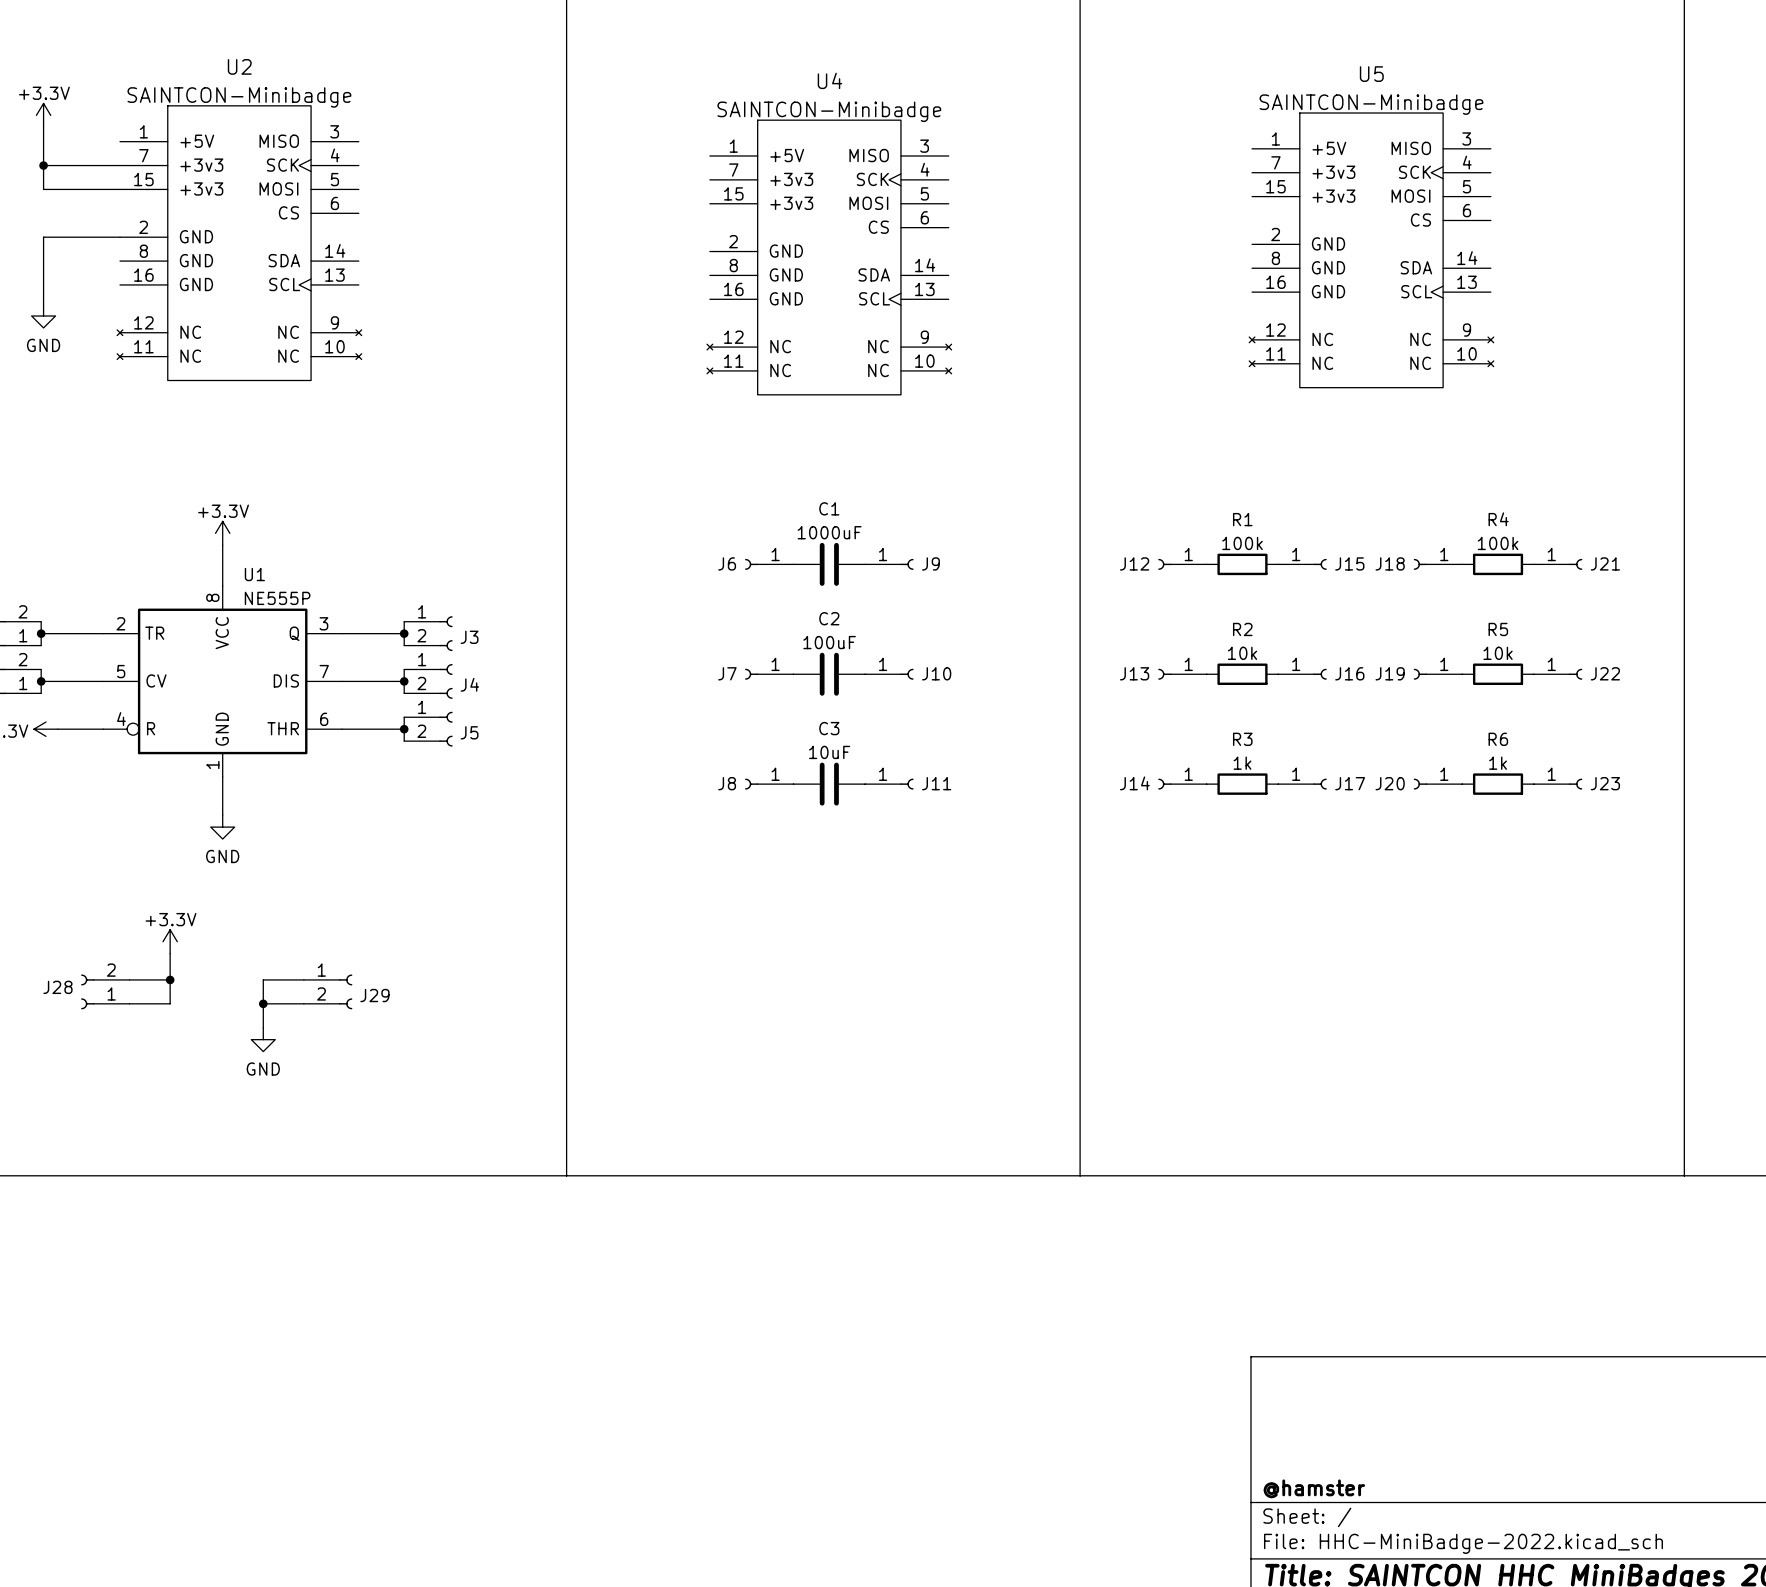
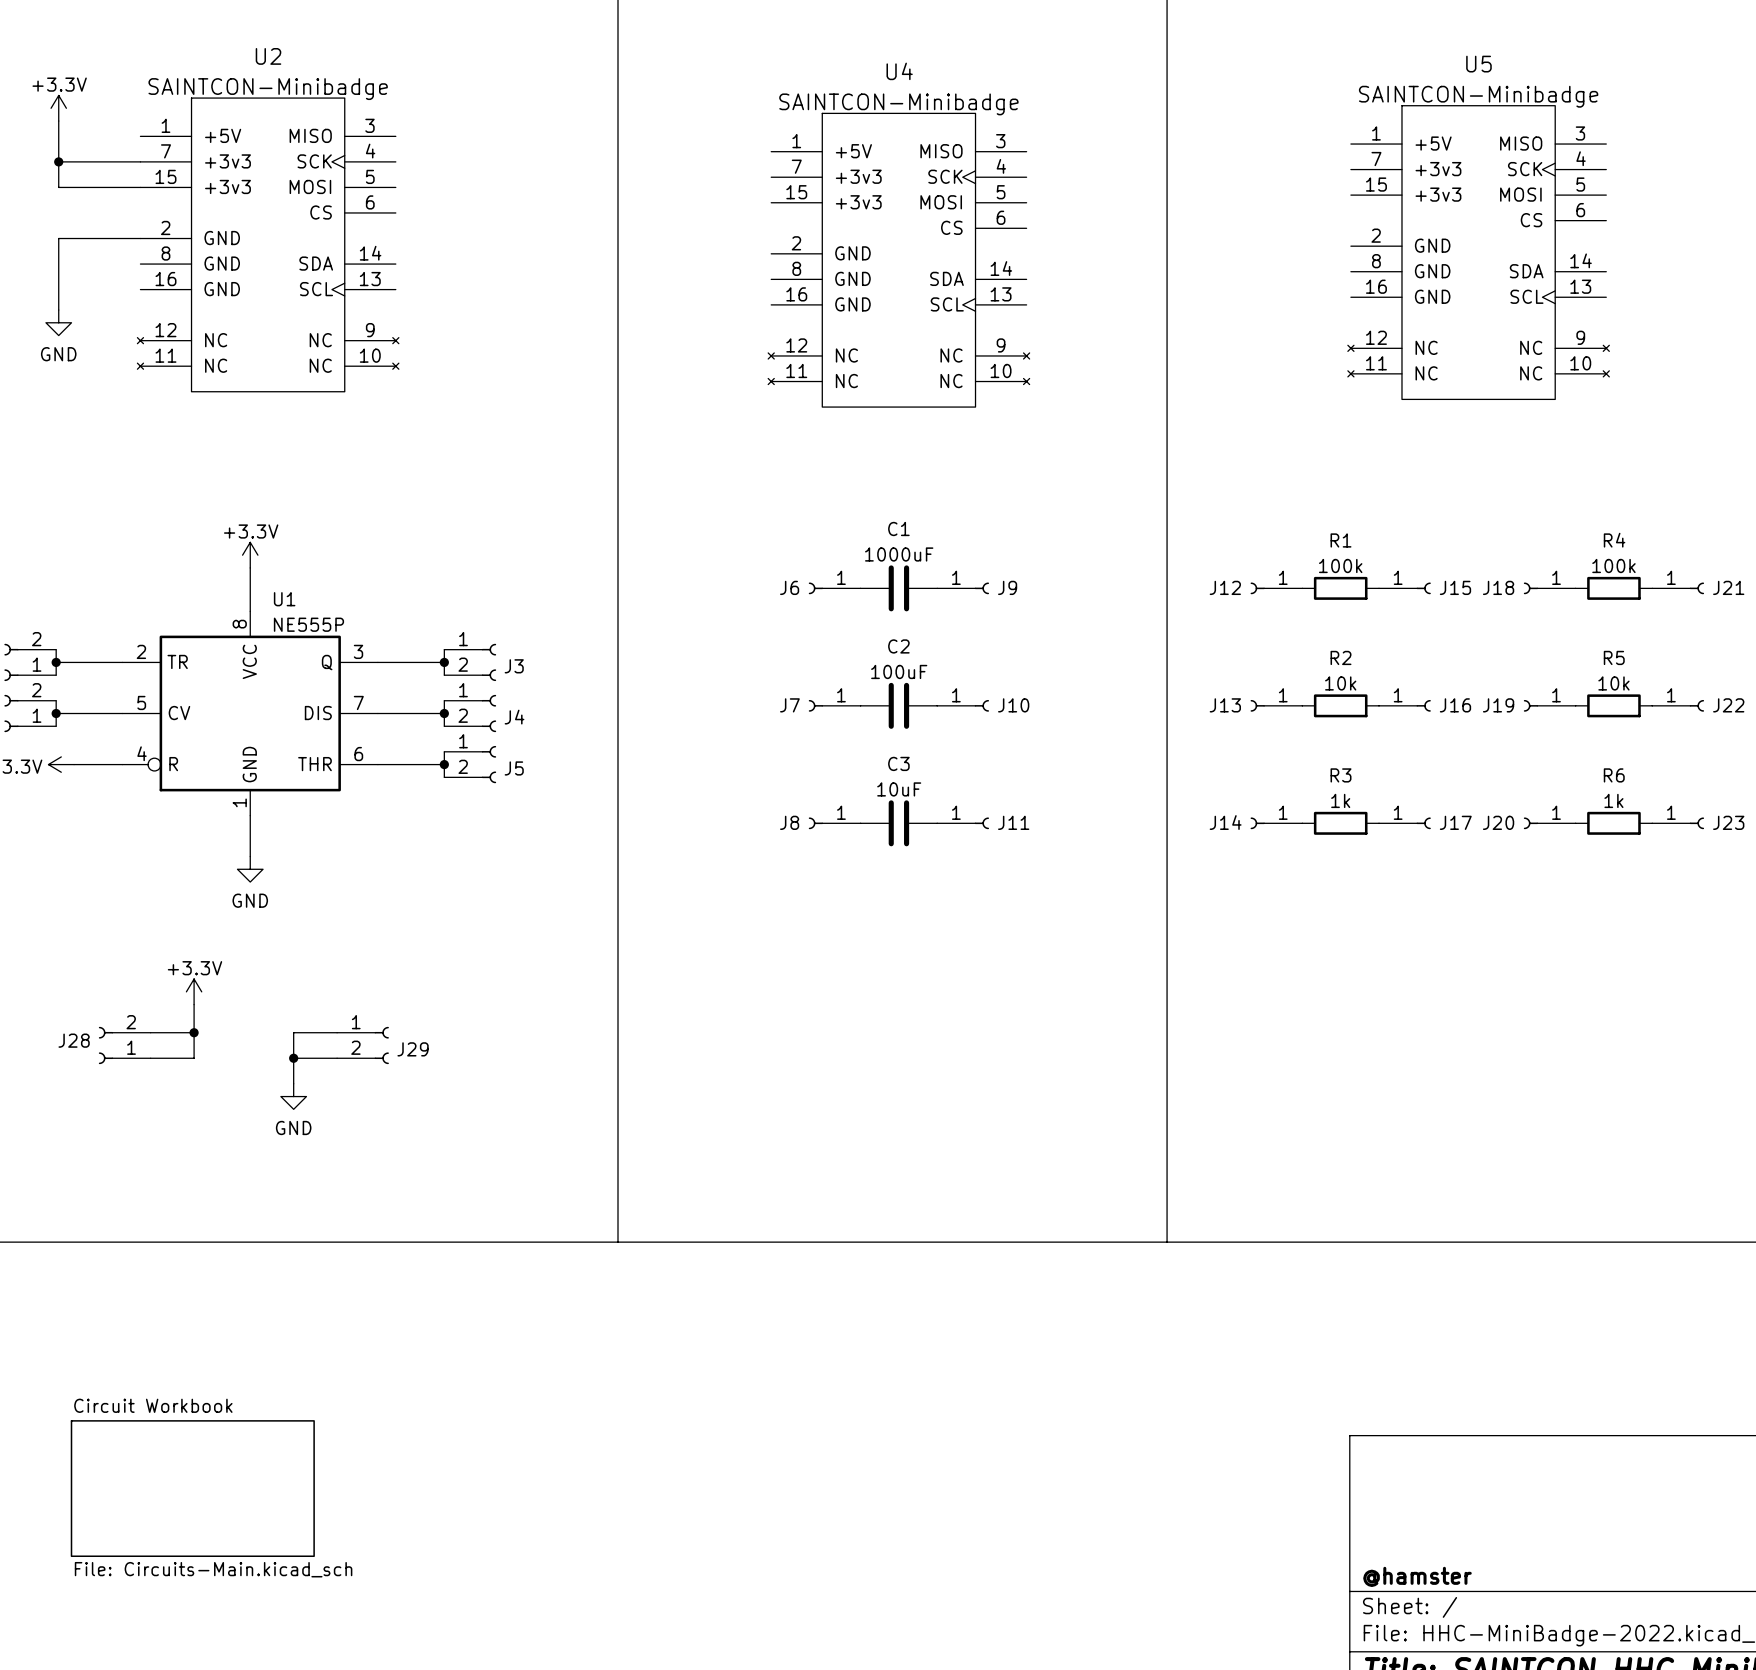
sheet Circuit Workbook: none -> File: Circuits-Main.kicad_sch (192, 1488)

